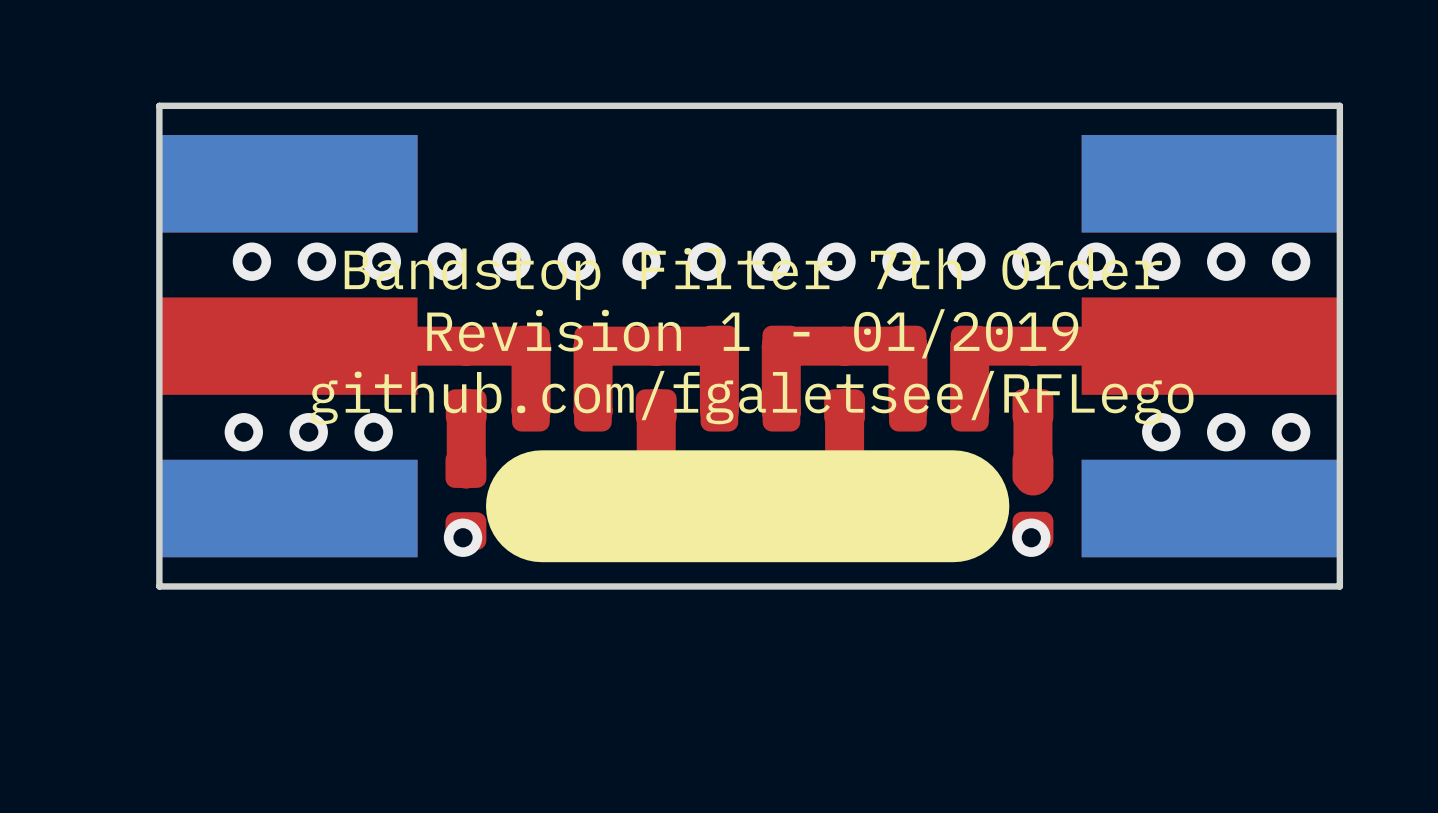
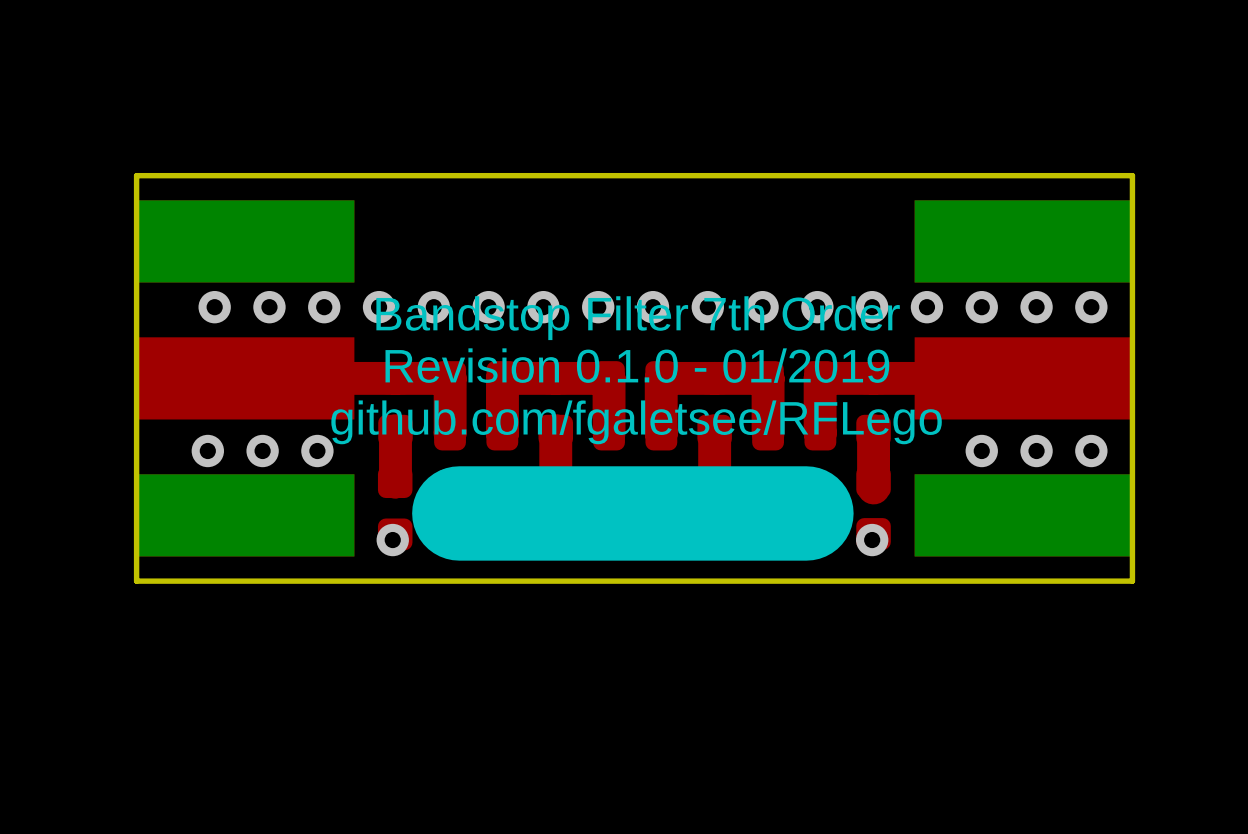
text: Revision 1 - 01/2019 (752, 333) -> Revision 0.1.0 - 01/2019 (637, 365)

